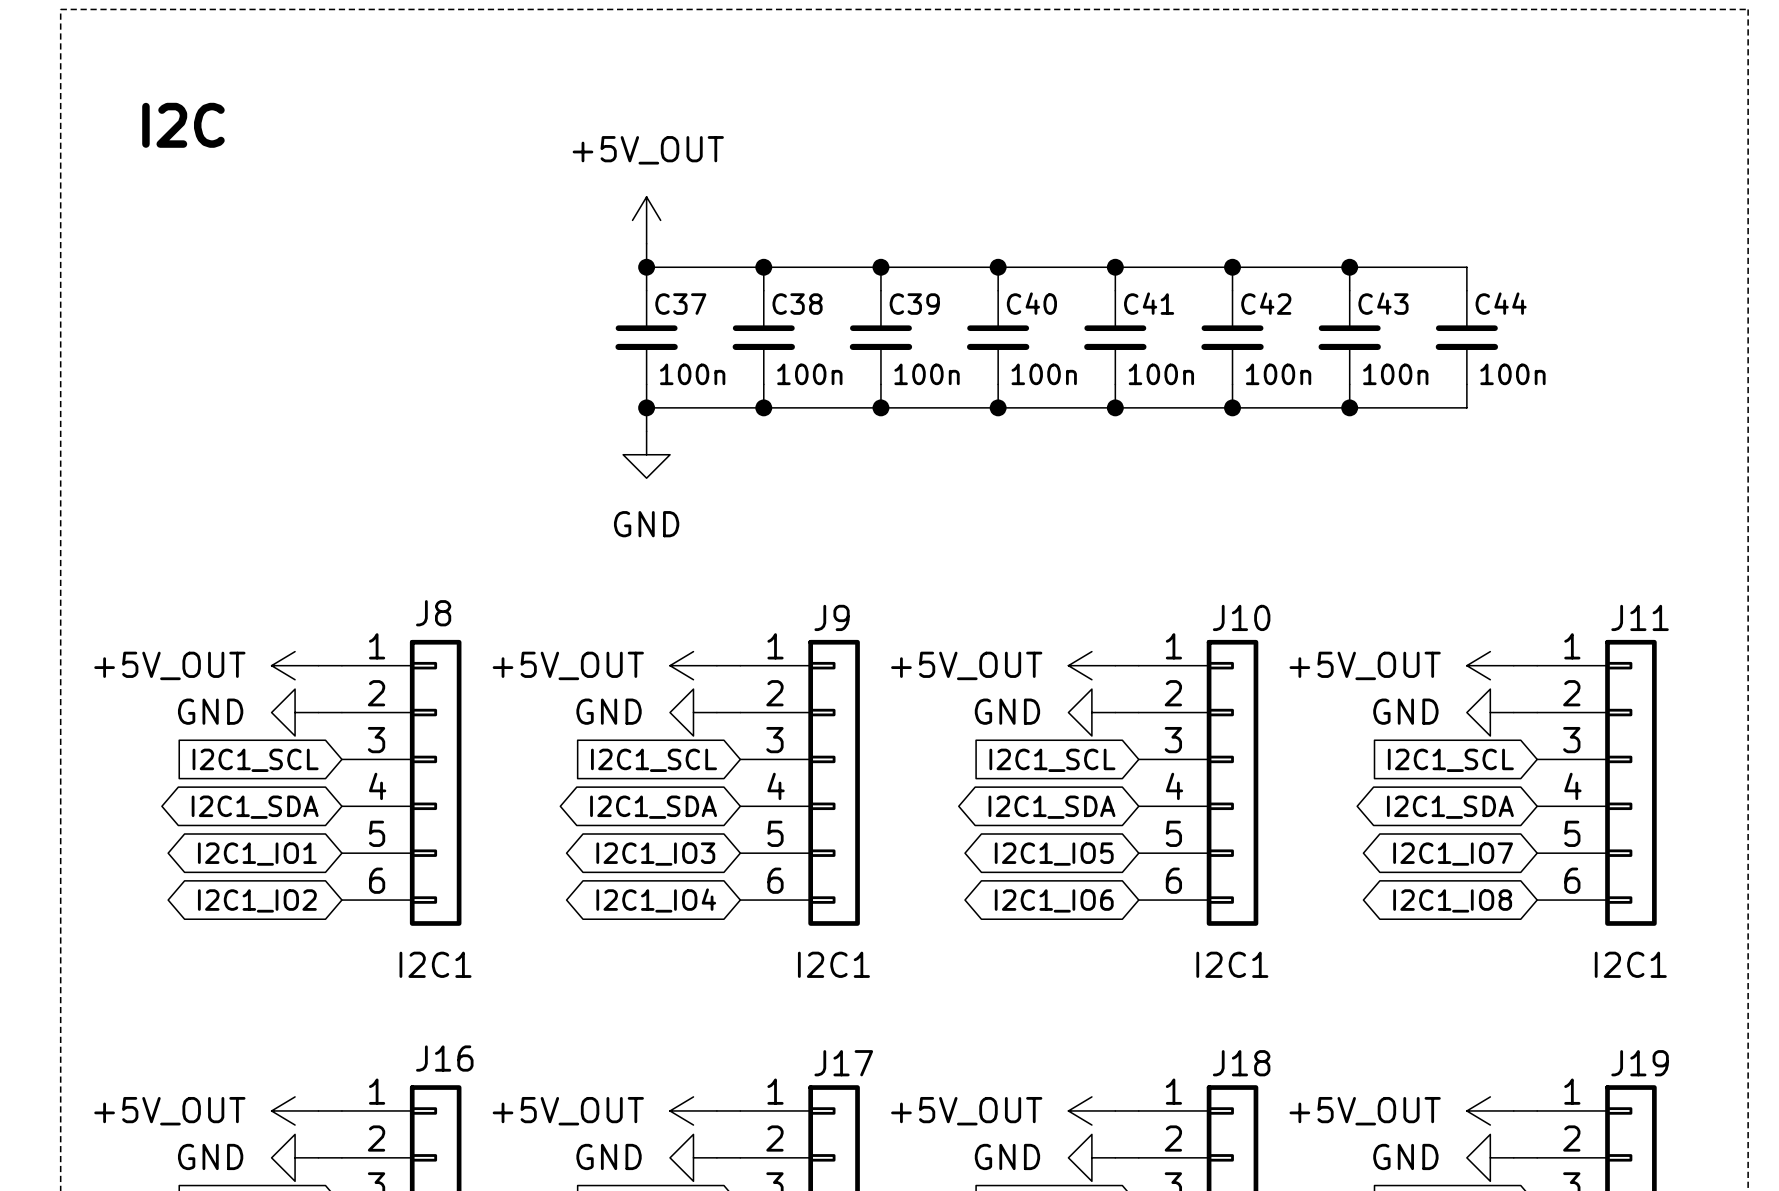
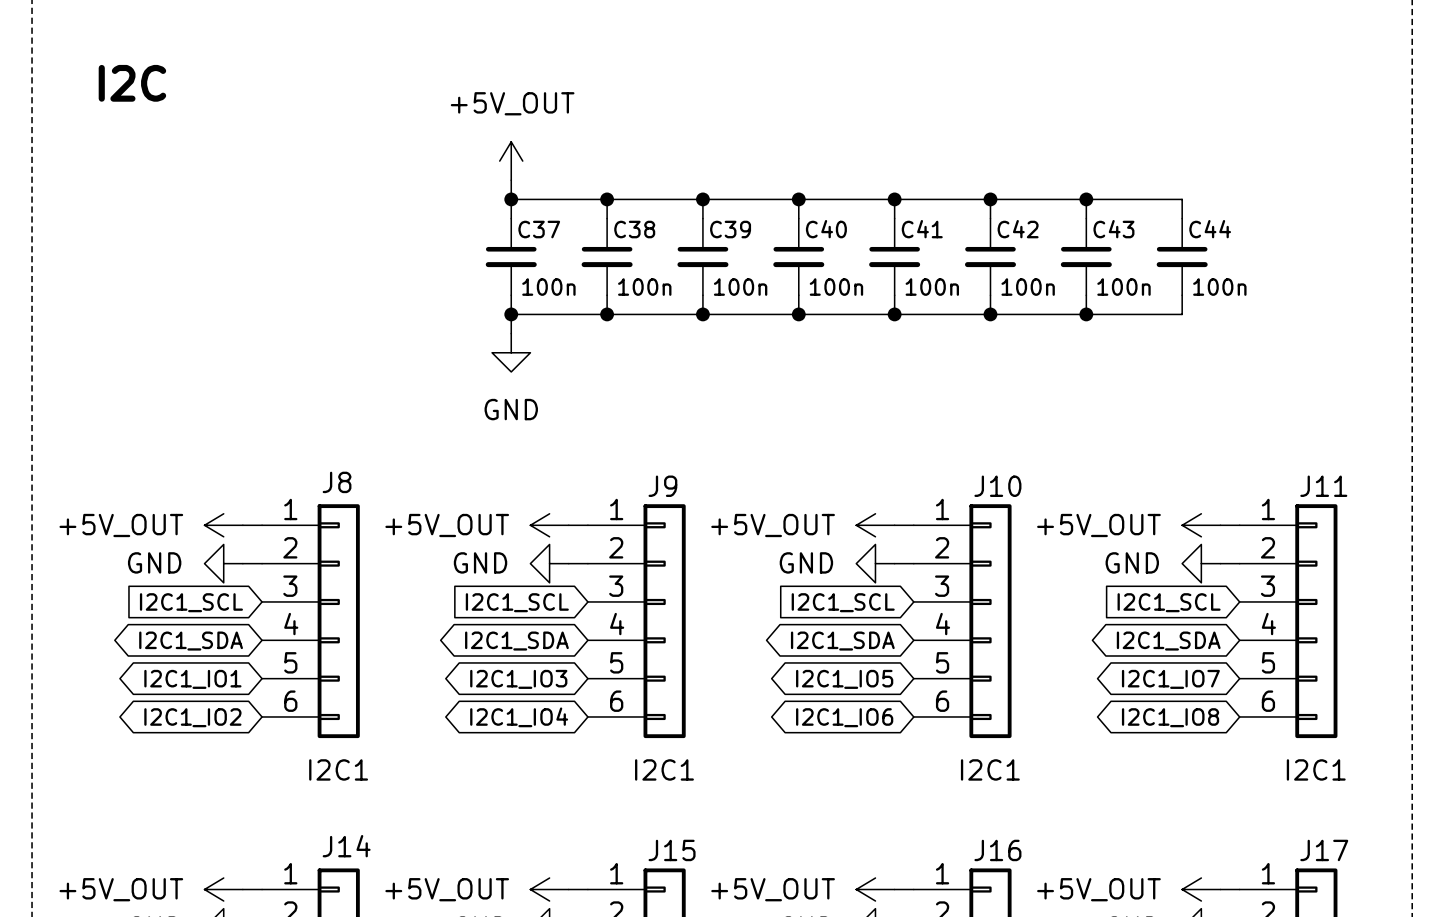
J16 name: J16 (444, 1058) -> J14 (346, 846)
J17 name: J17 (843, 1063) -> J15 (672, 850)
J18 name: J18 (1241, 1063) -> J16 (997, 850)
J19 name: J19 (1640, 1063) -> J17 (1324, 850)

